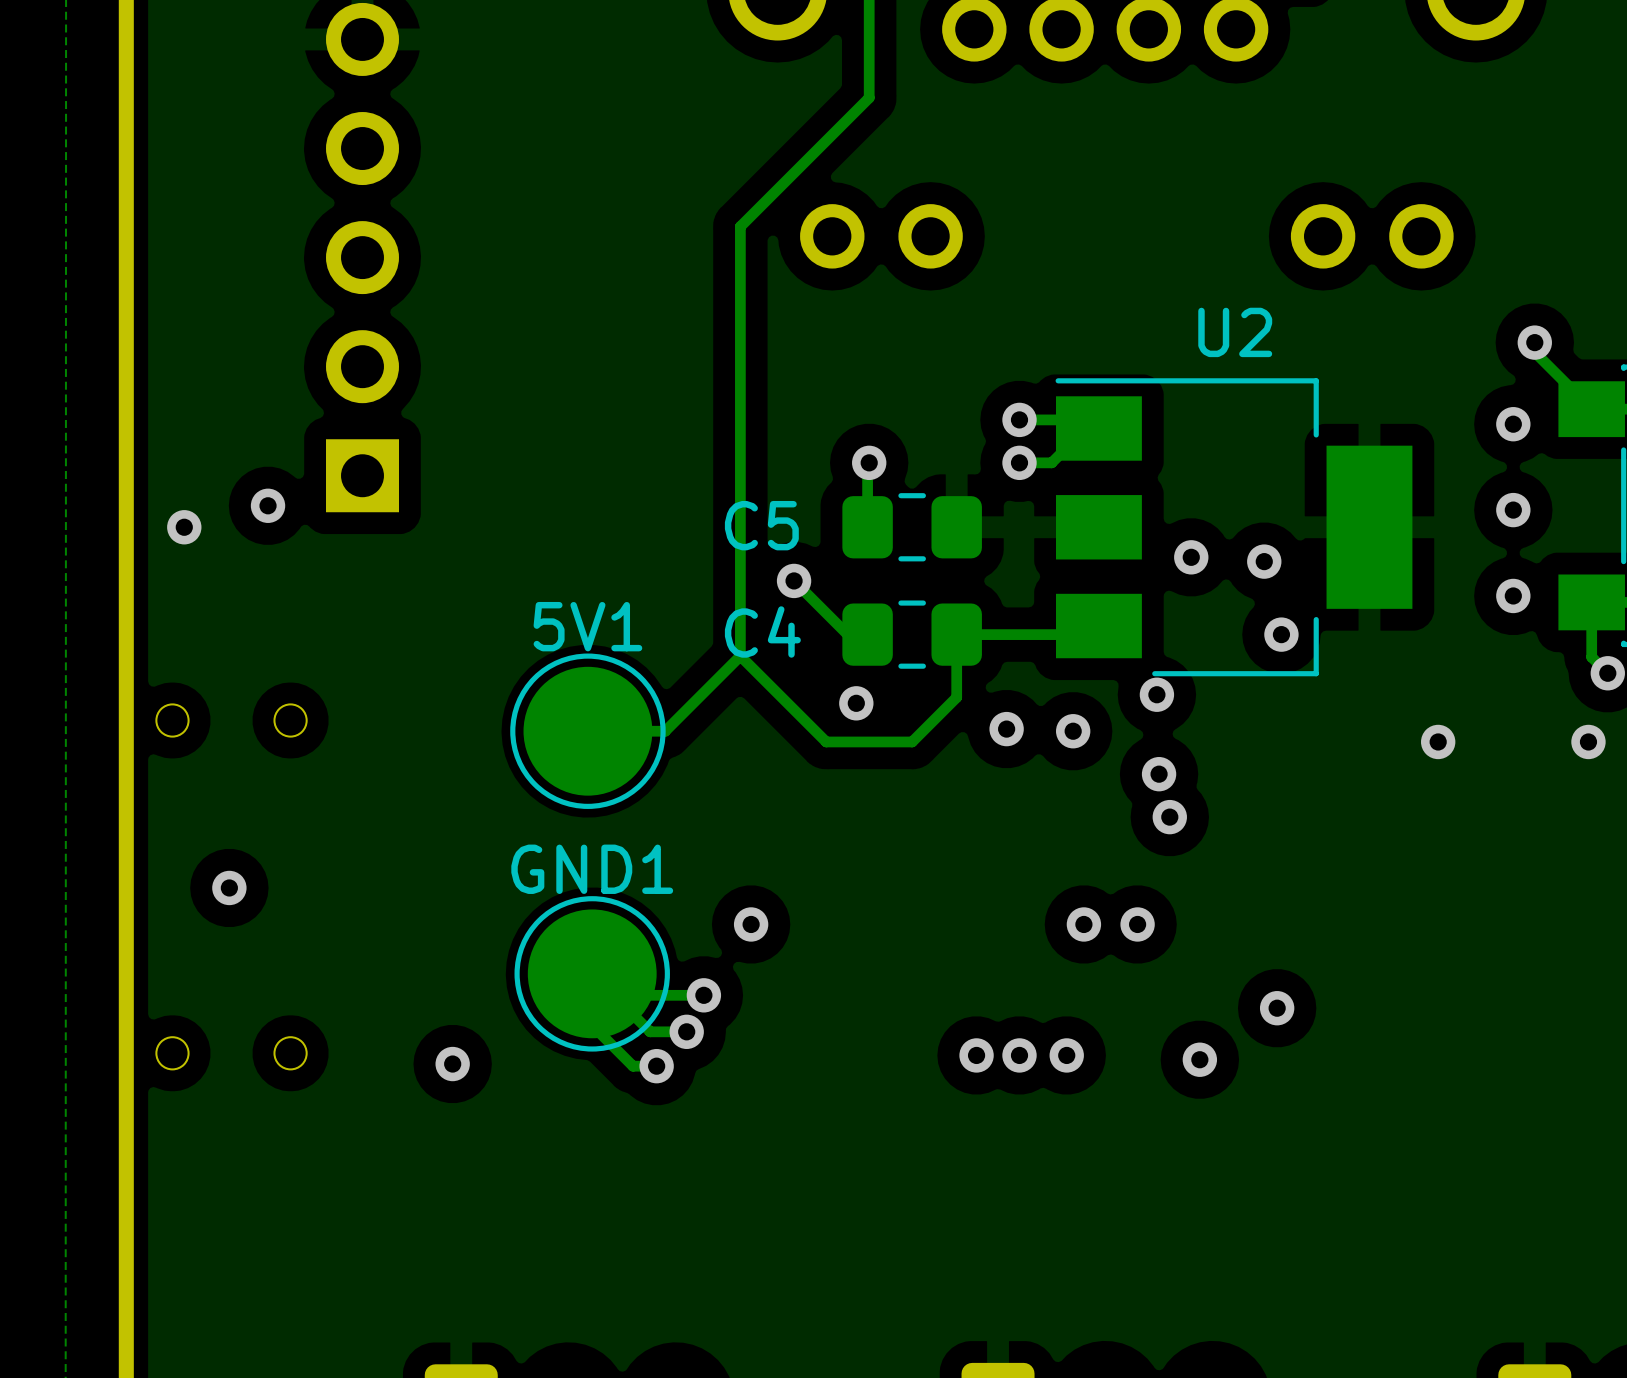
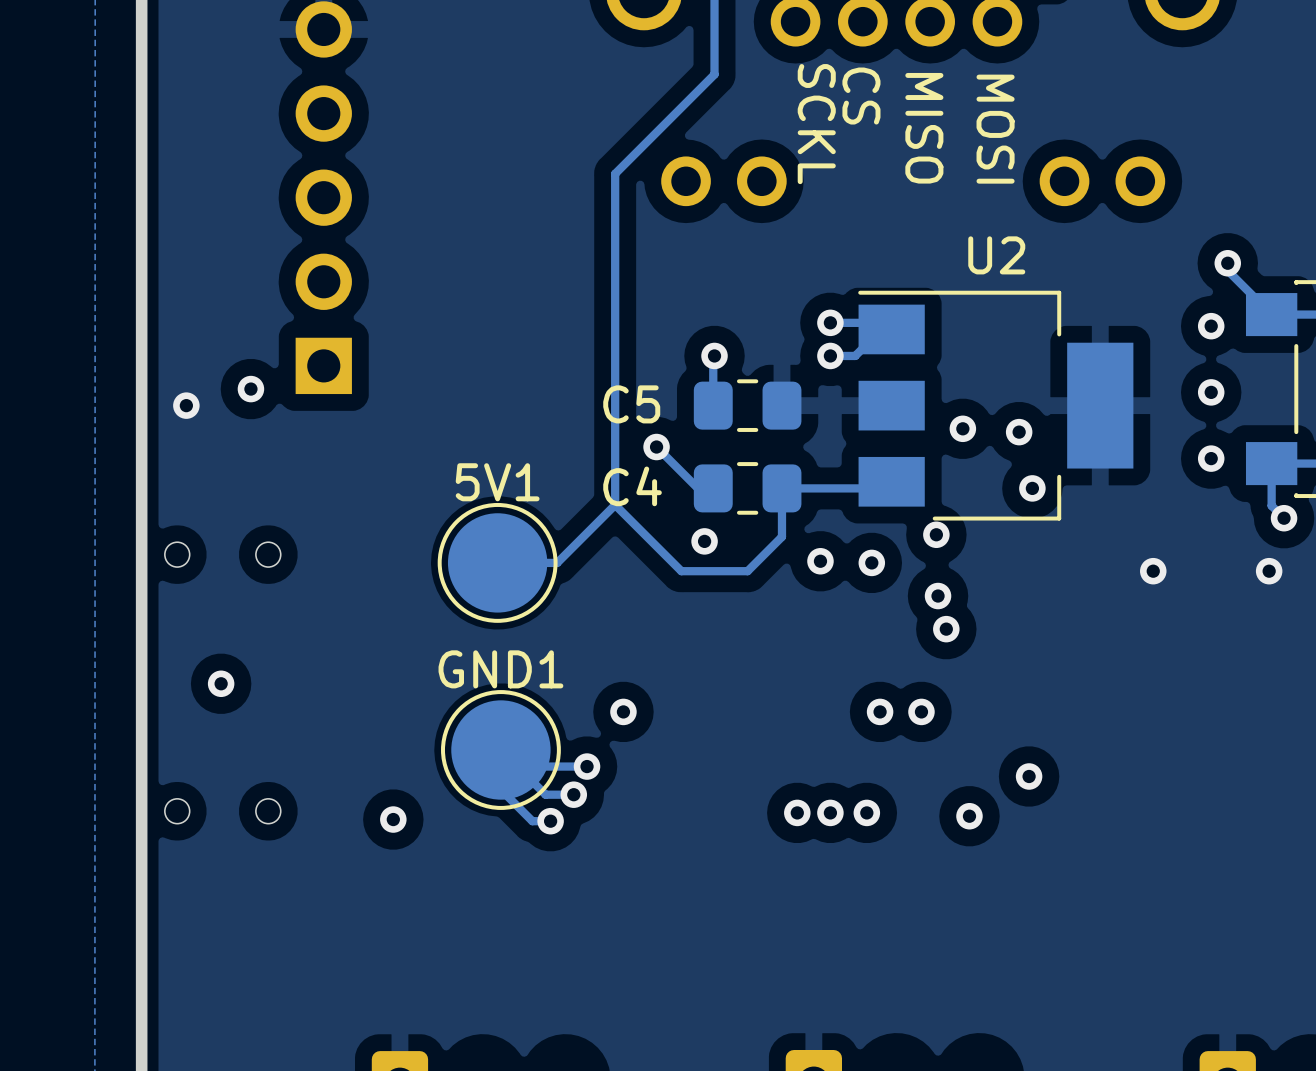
text: none -> CS (861, 96)
text: none -> SCKL (816, 124)
text: none -> MISO (924, 128)
text: none -> MOSI (995, 129)

